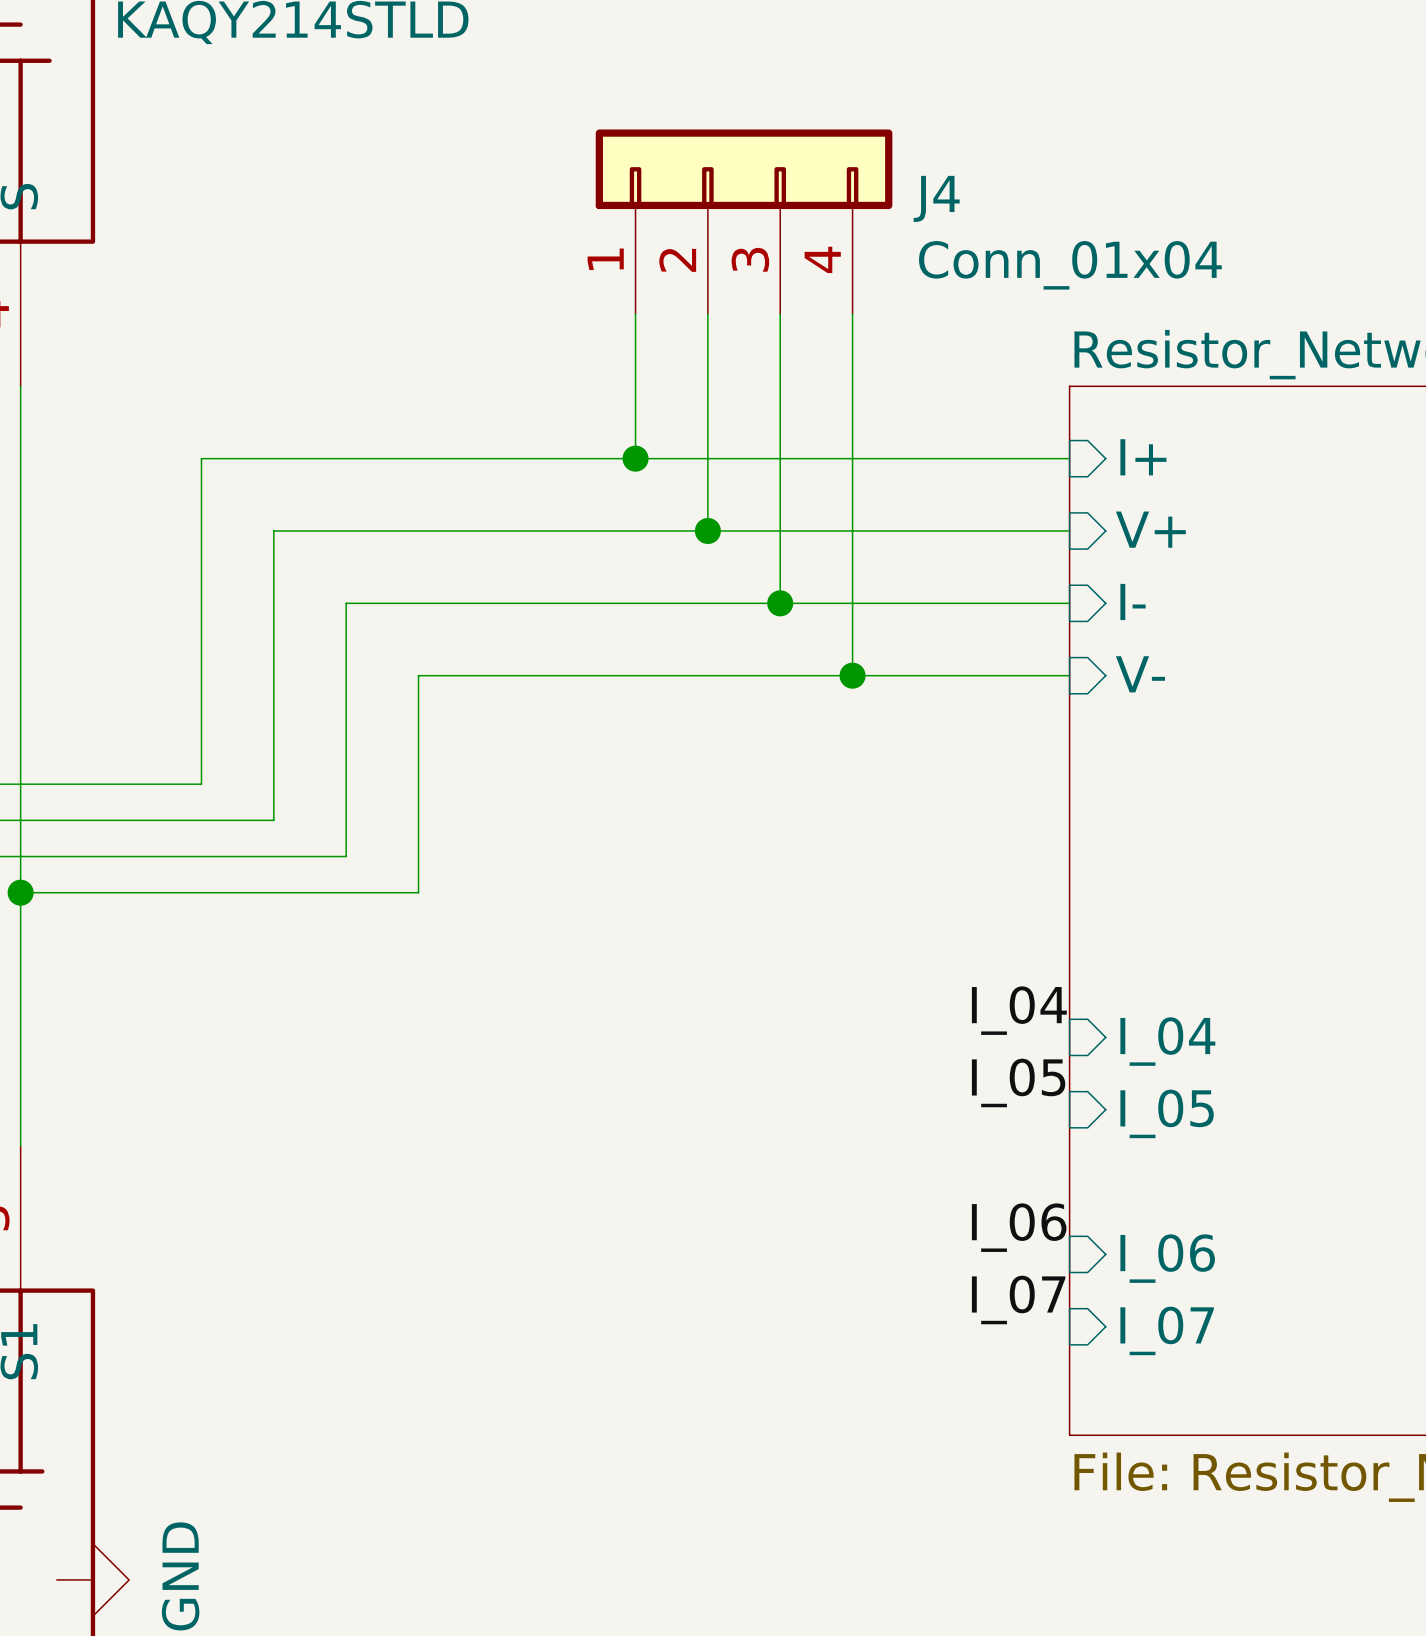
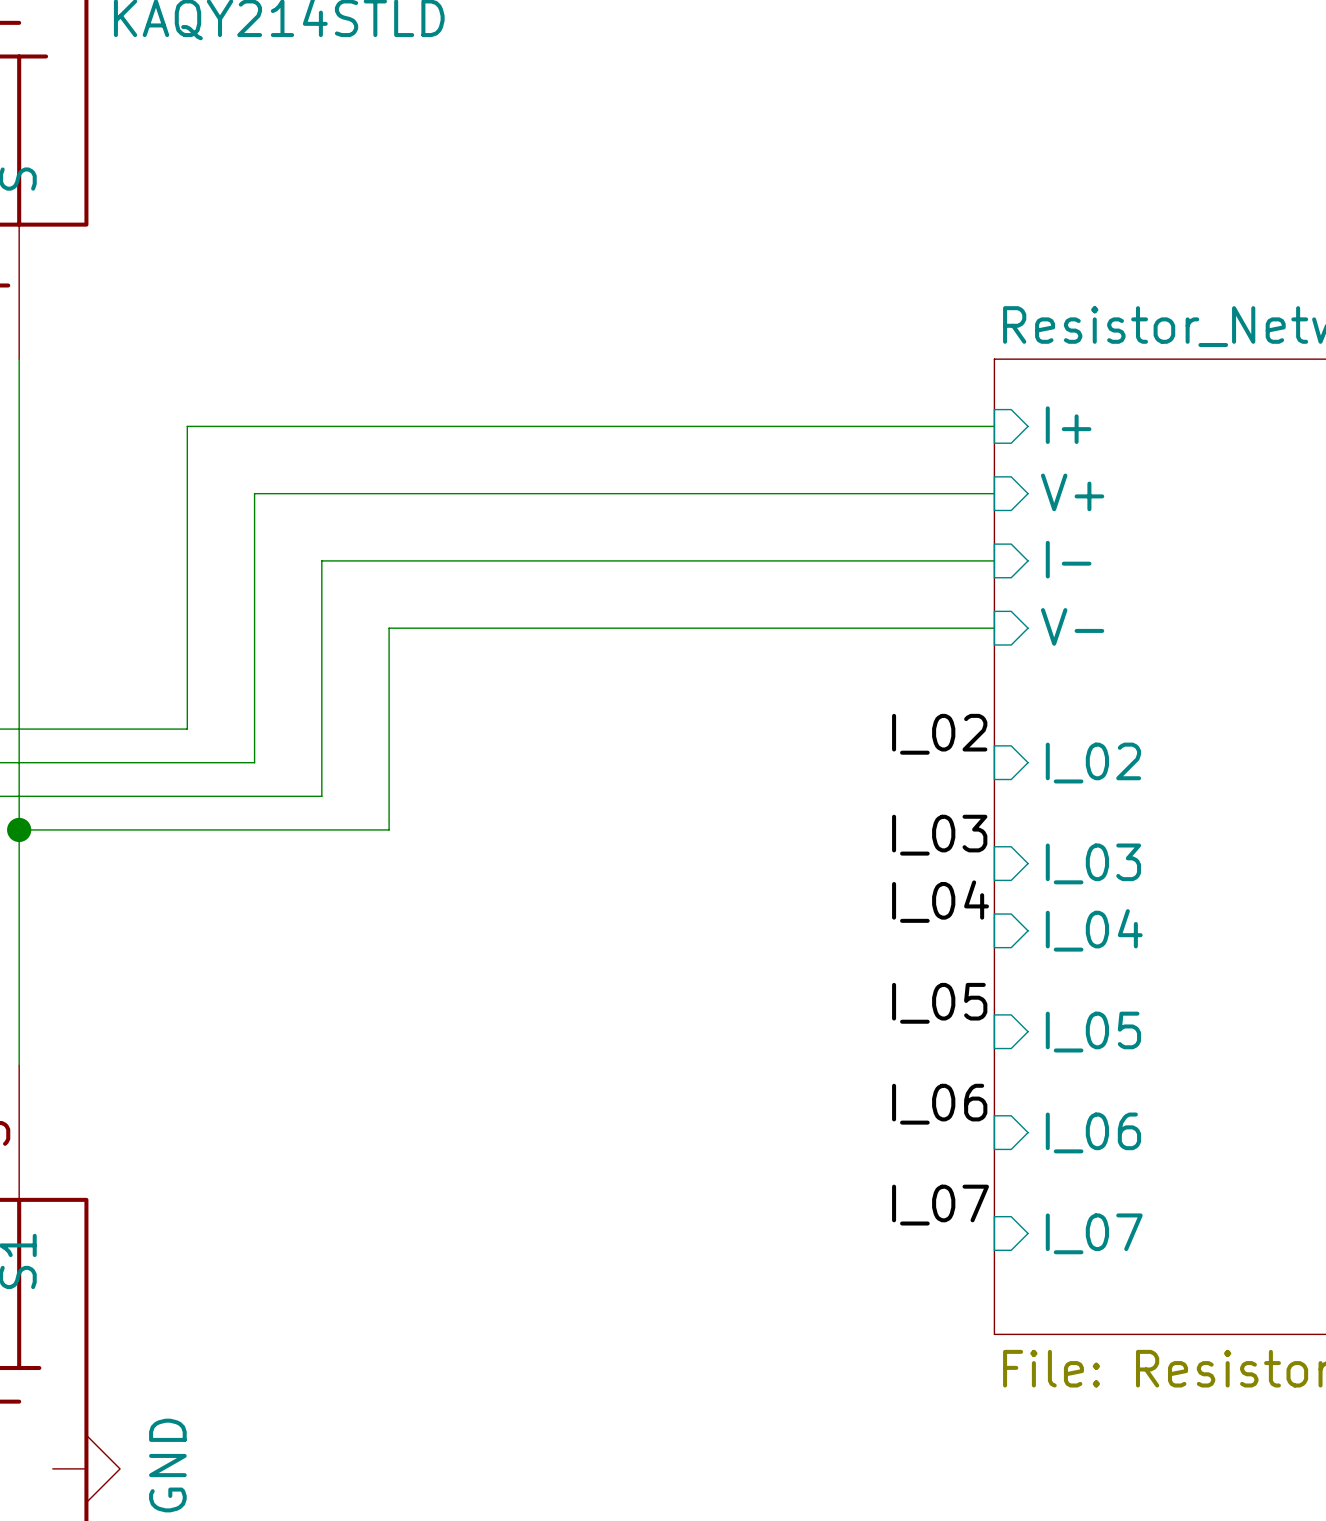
J4: Conn_01x04 (744, 221) -> none
wire: (635, 313) (635, 458) -> none
wire: (707, 313) (707, 530) -> none
wire: (780, 313) (780, 603) -> none
wire: (852, 313) (852, 675) -> none
junction: (635, 458) -> none
junction: (707, 530) -> none
junction: (780, 603) -> none
junction: (852, 675) -> none
label: none -> I_02 (939, 734)
sheet pin: none -> I_02 (1093, 763)
label: none -> I_03 (939, 835)
sheet pin: none -> I_03 (1093, 863)
label position: I_04 (1019, 1010) -> I_04 (940, 901)
sheet pin position: I_04 (1167, 1041) -> I_04 (1094, 930)
label position: I_06 (1019, 1227) -> I_06 (939, 1104)
sheet pin position: I_06 (1167, 1258) -> I_06 (1093, 1132)

